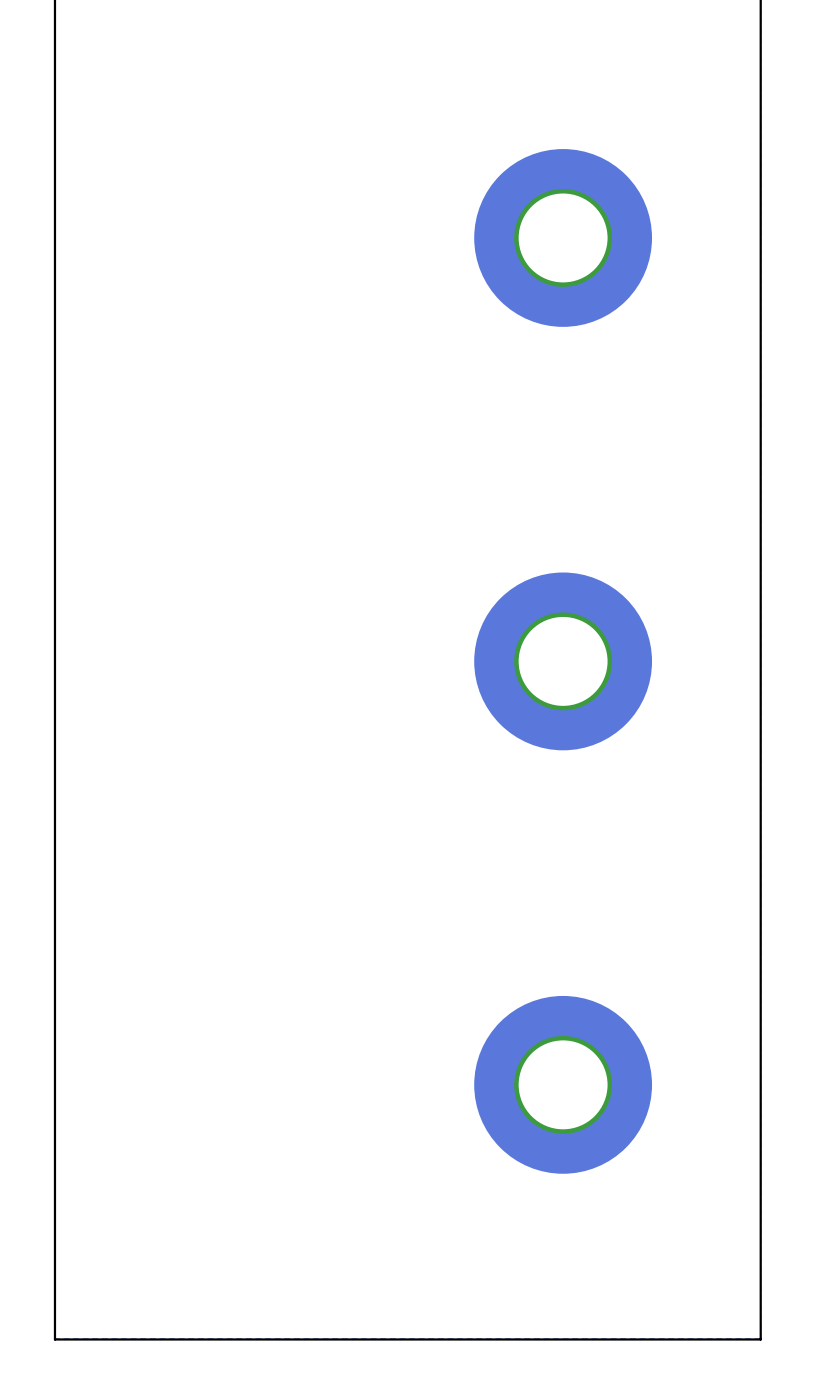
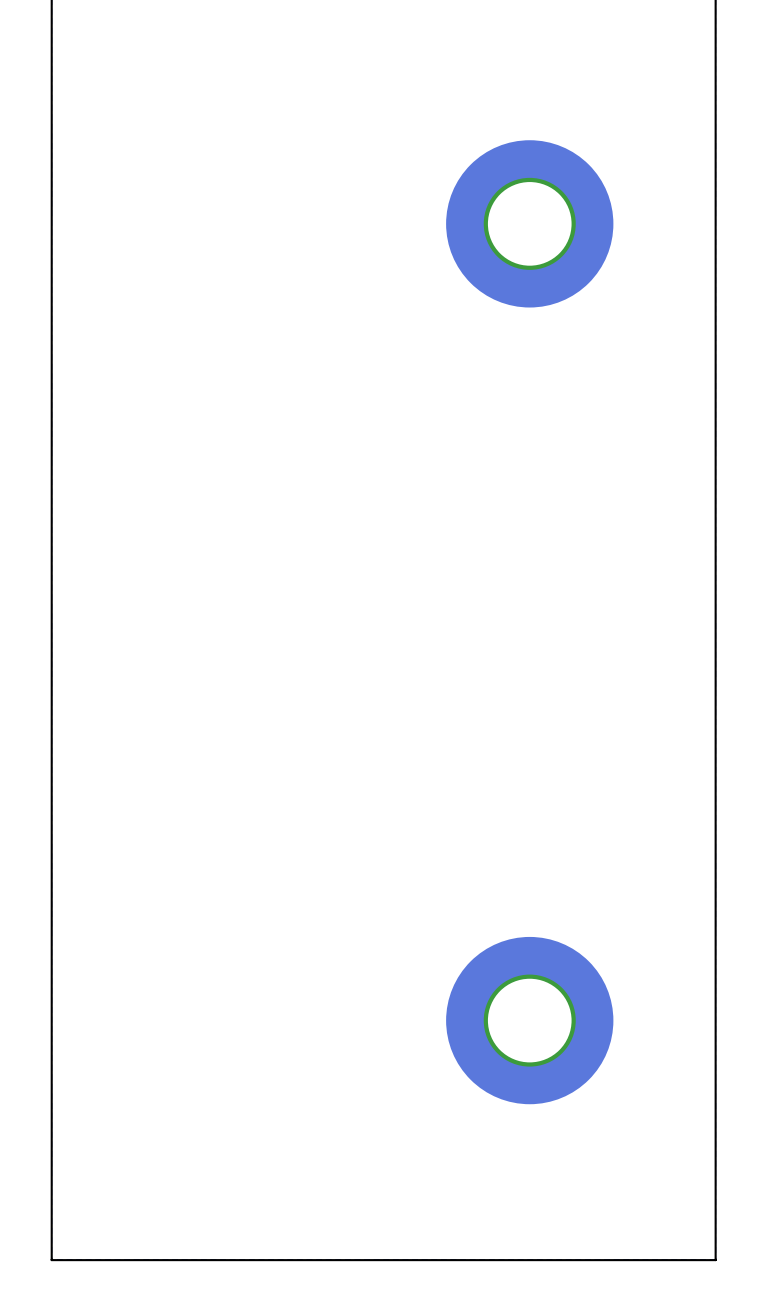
part: (563, 661) -> none

